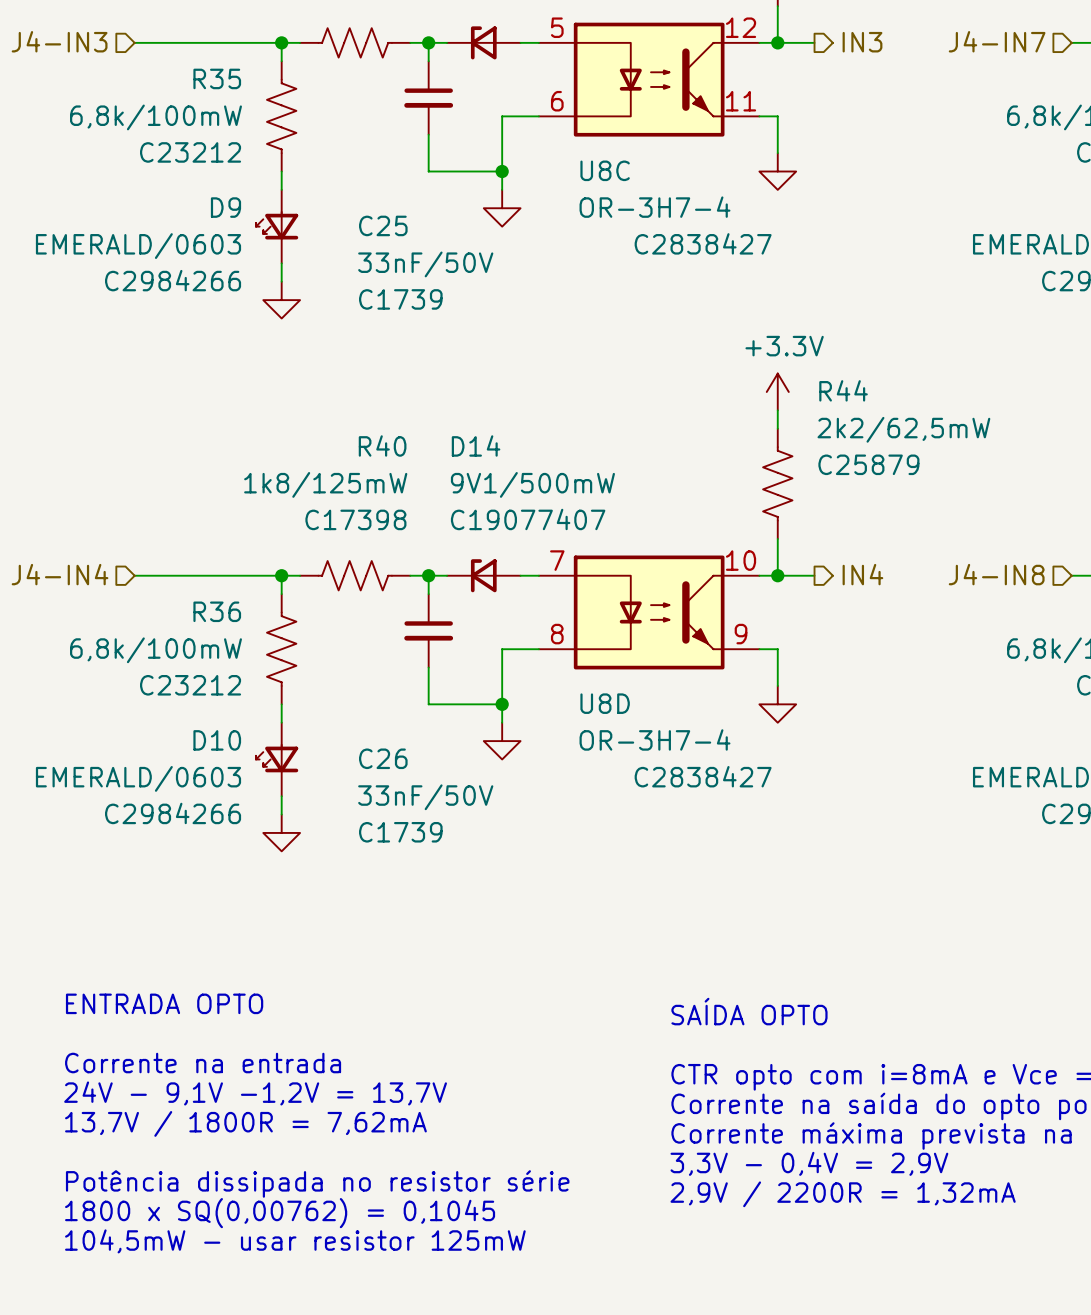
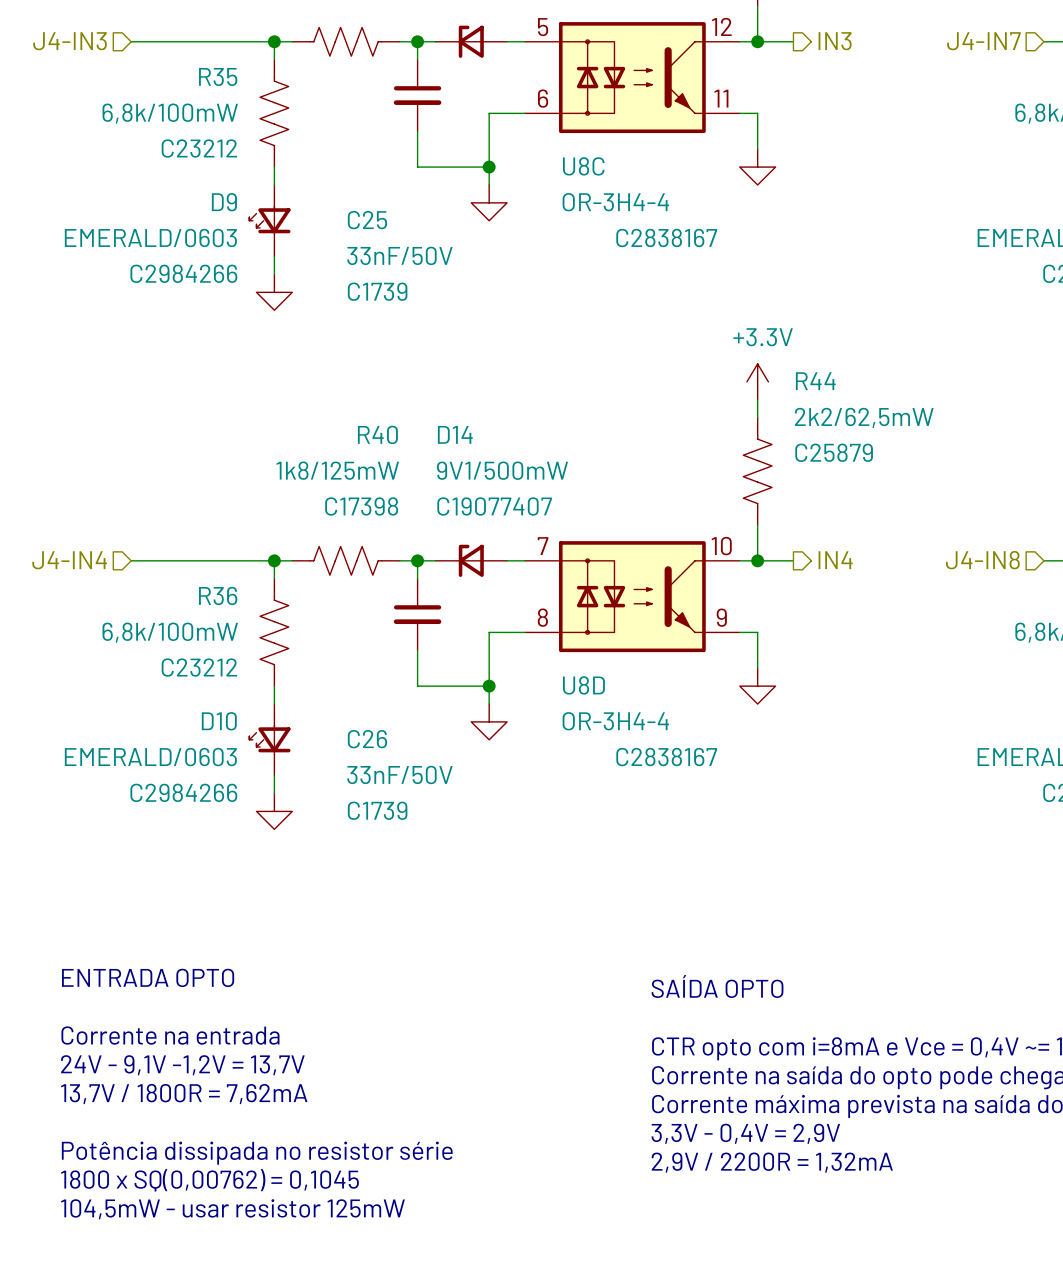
U8C symbol: [538, 22, 760, 137] -> [524, 22, 740, 134]
U8C value: OR-3H7-4 (654, 207) -> OR-3H4-4 (615, 202)
U8C text: C2838427 (703, 243) -> C2838167 (666, 237)
U8D symbol: [538, 555, 760, 670] -> [524, 541, 740, 653]
U8D value: OR-3H7-4 (654, 739) -> OR-3H4-4 (615, 721)
U8D text: C2838427 (703, 776) -> C2838167 (666, 757)

